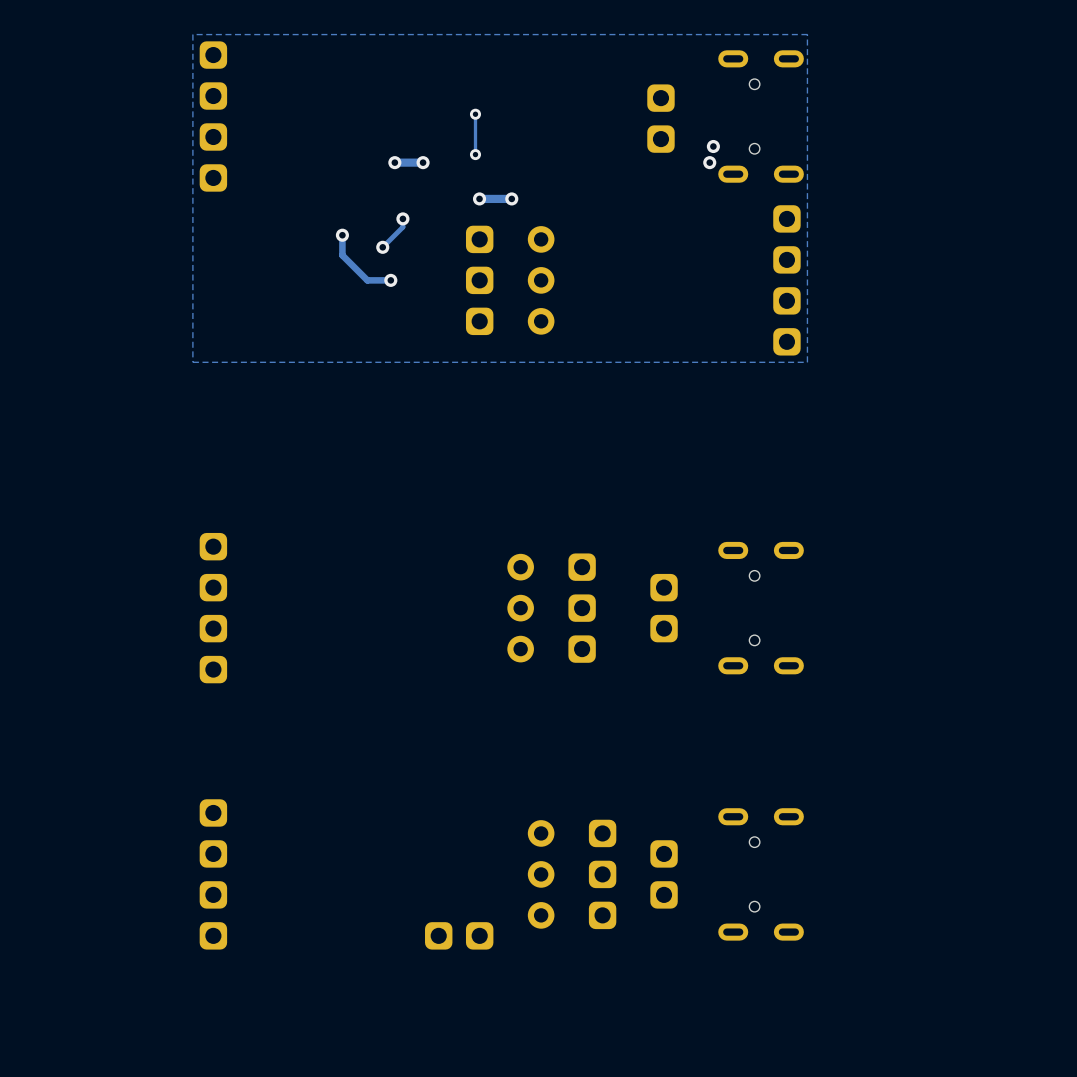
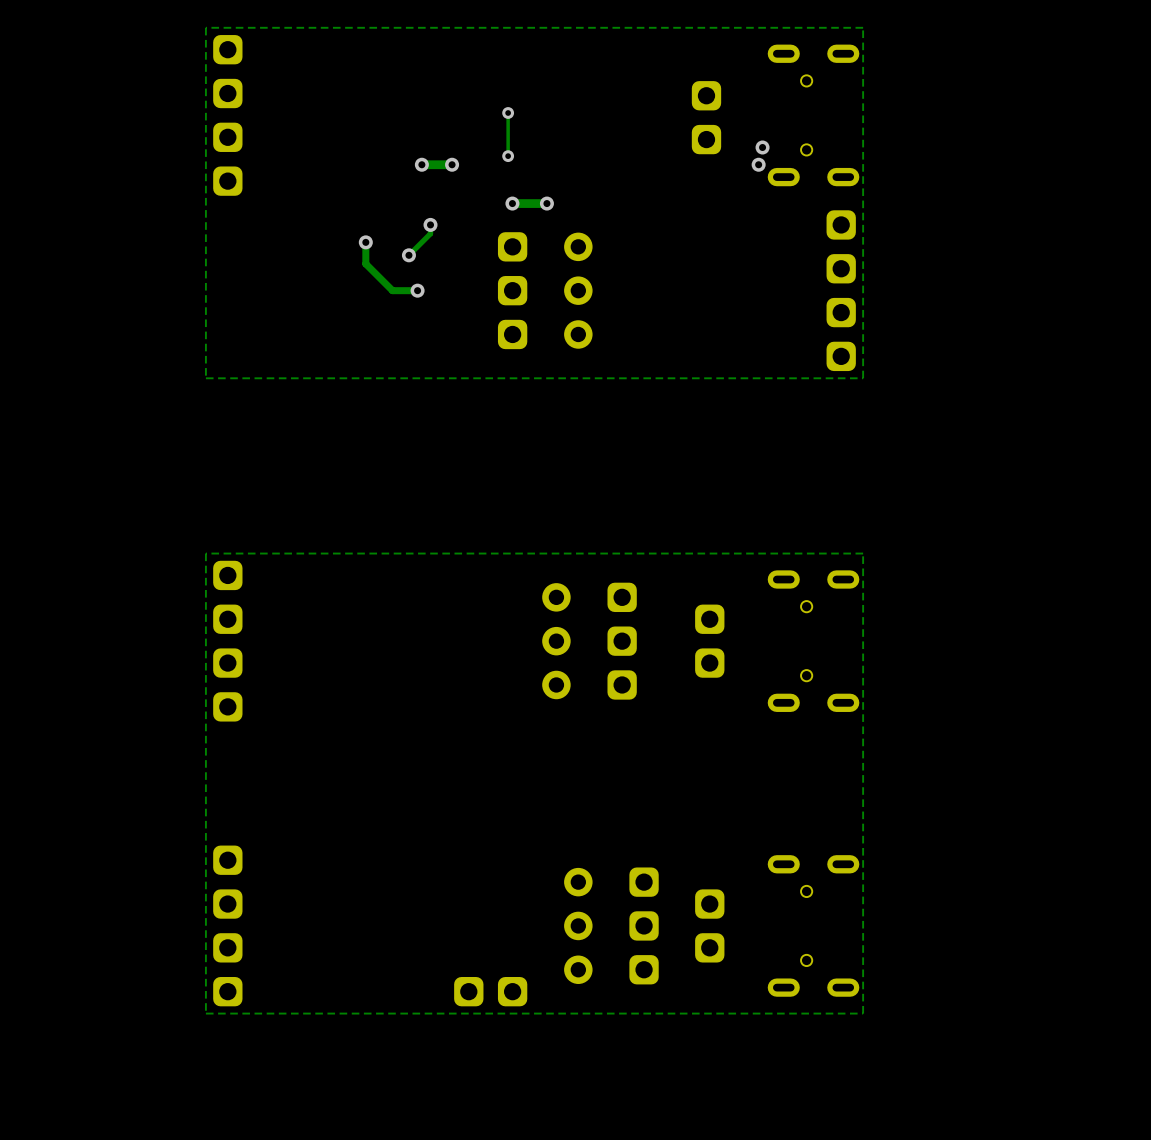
zone outline: none -> (863, 553) (863, 1013) (205, 1013) (205, 553) (863, 553)

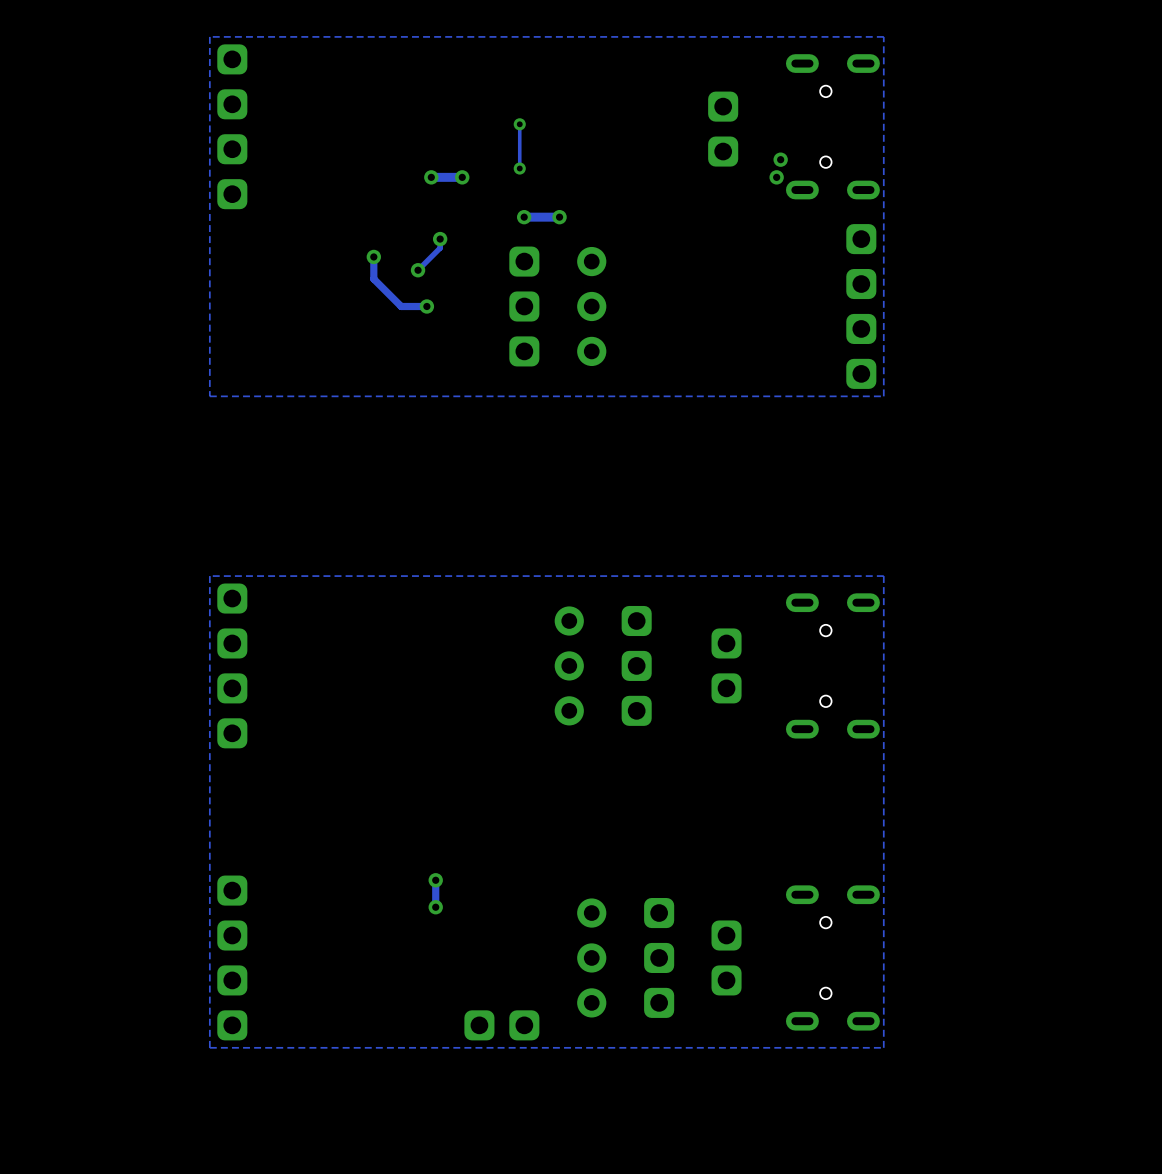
track: none -> (435, 880) (435, 907)
via: none -> (435, 880)
via: none -> (435, 907)

